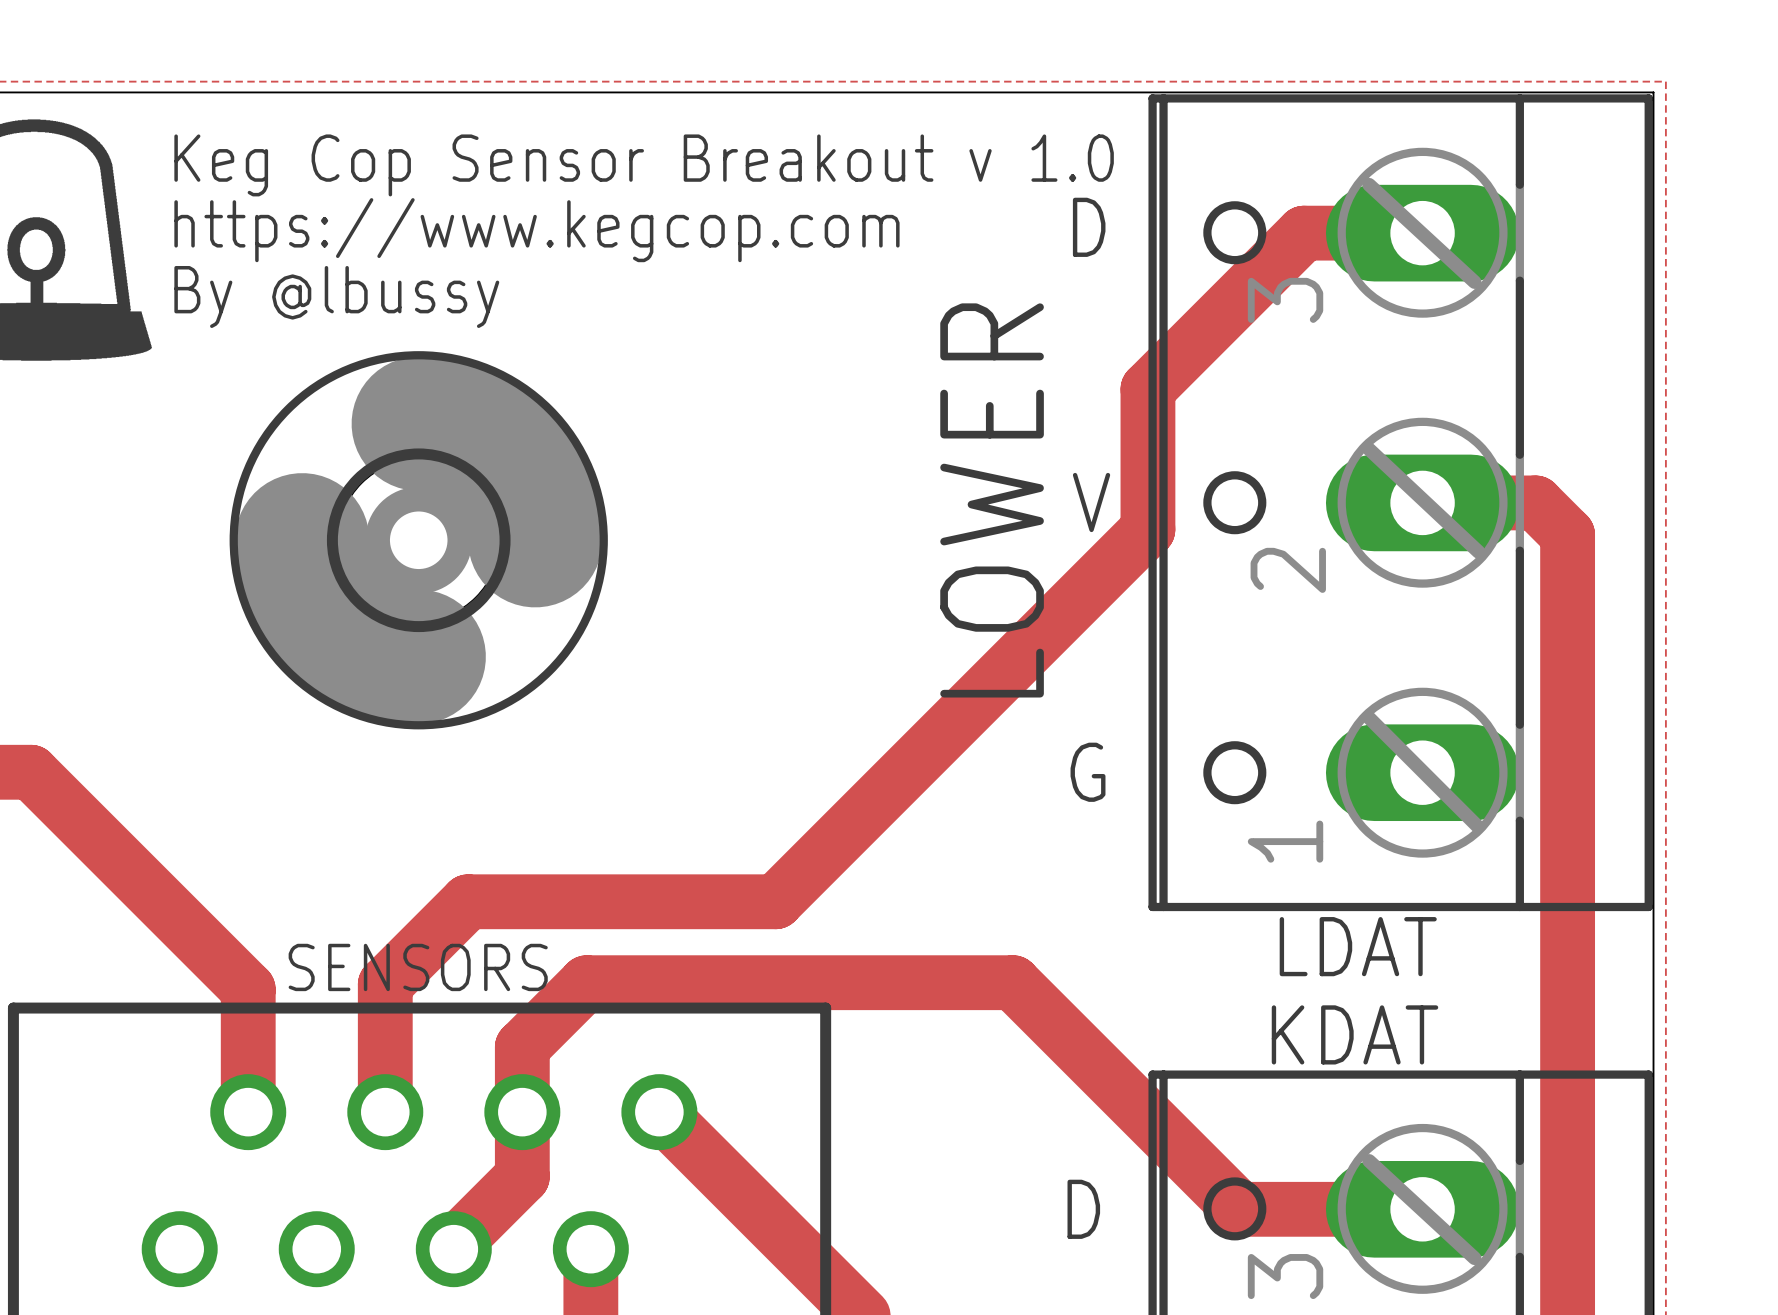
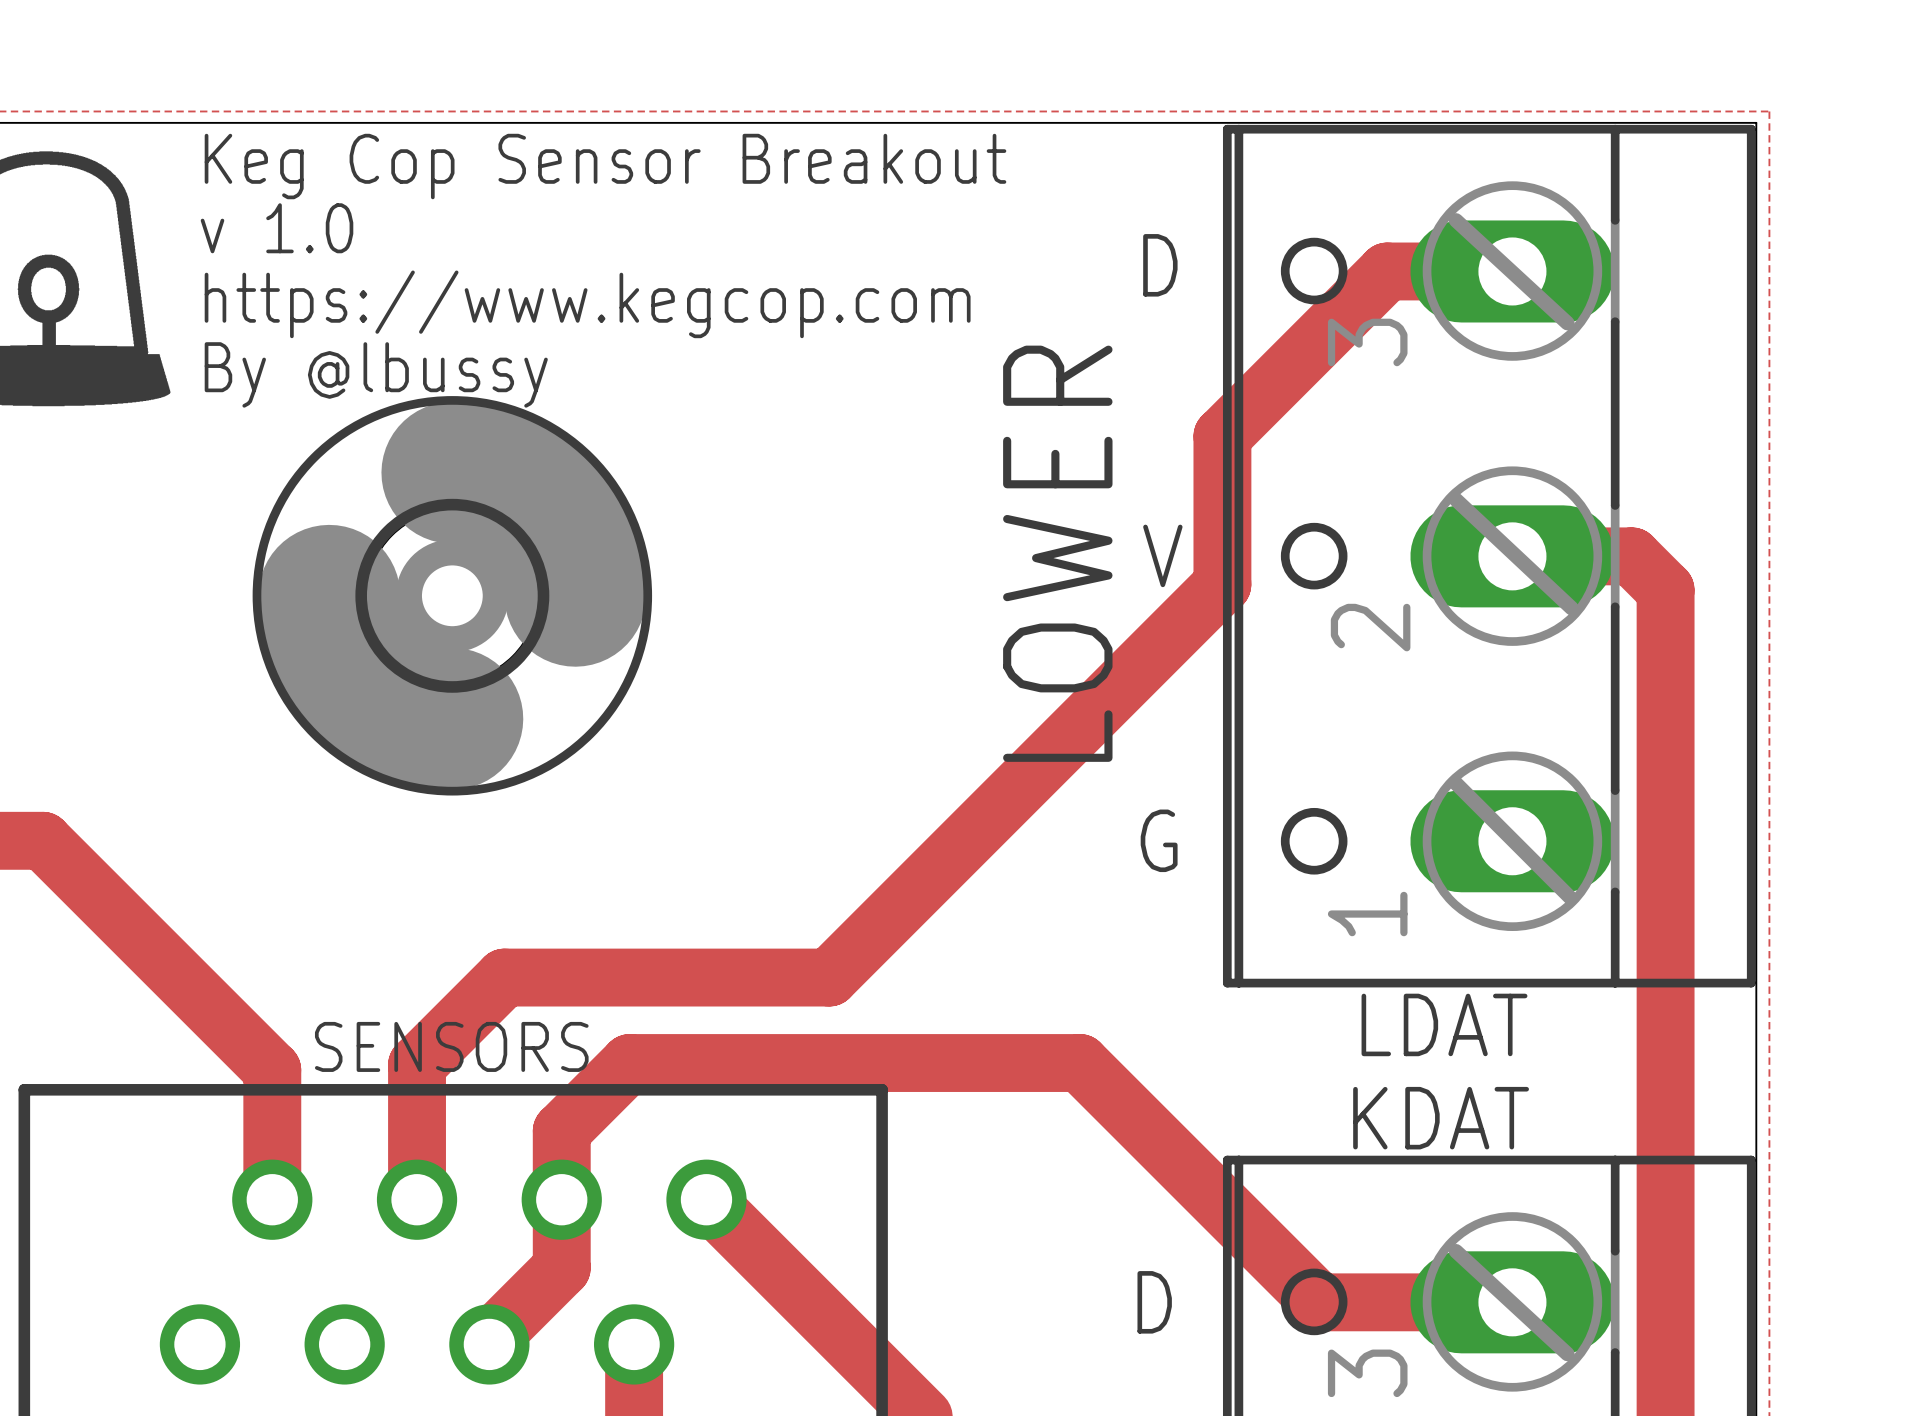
text: Keg Cop Sensor Breakout v 1.0 (644, 165) -> Keg Cop Sensor Breakout (605, 166)
text: none -> v 1.0 (277, 228)
text position: https://www.kegcop.com (536, 230) -> https://www.kegcop.com (587, 304)
text position: By @lbussy (336, 296) -> By @lbussy (376, 374)

